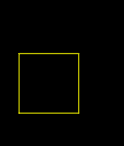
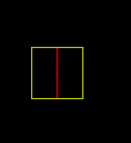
track: none -> (57, 48) (57, 97)

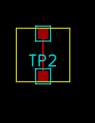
part: none -> (43, 33)
TP2: none -> (43, 76)

